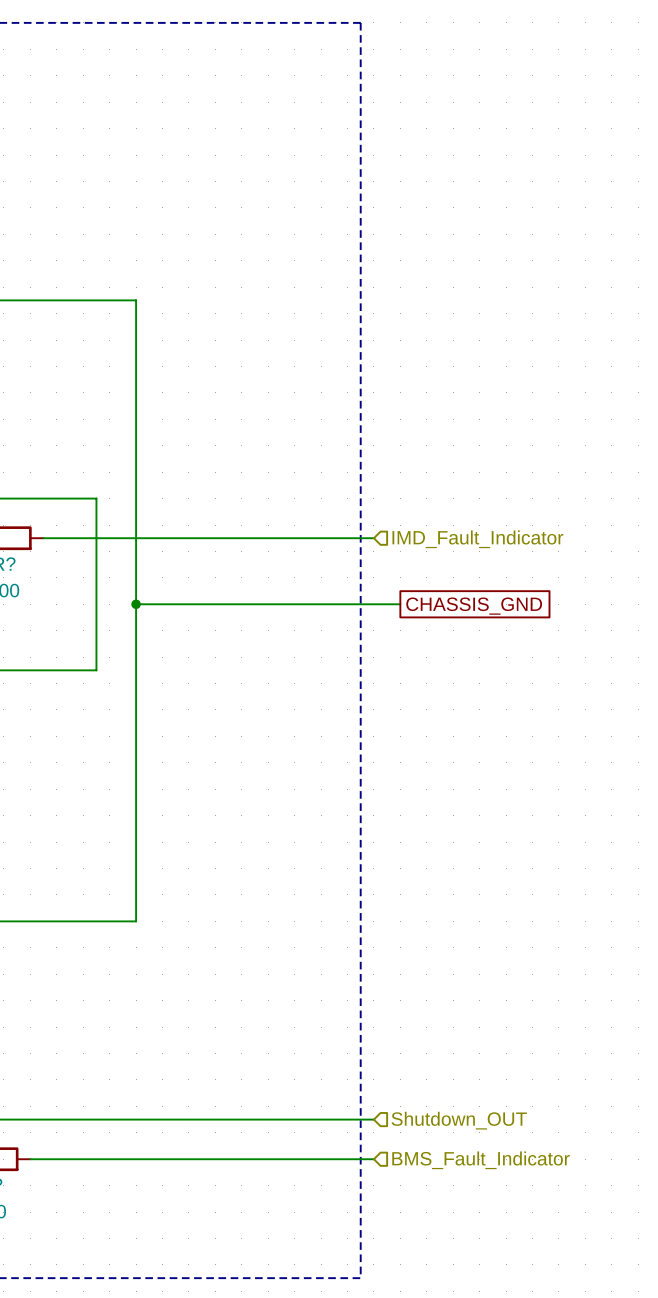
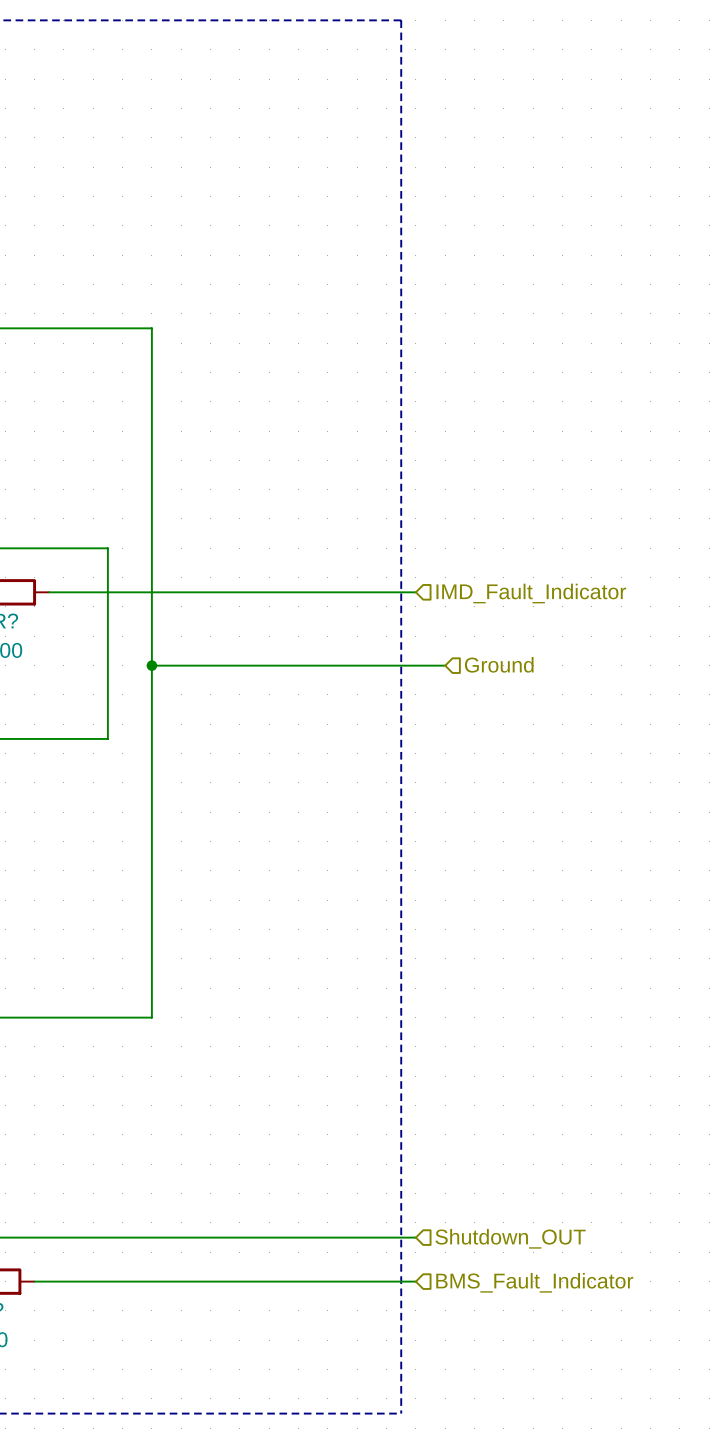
hierarchical label: none -> Ground (499, 664)
global label: CHASSIS_GND (474, 606) -> none

